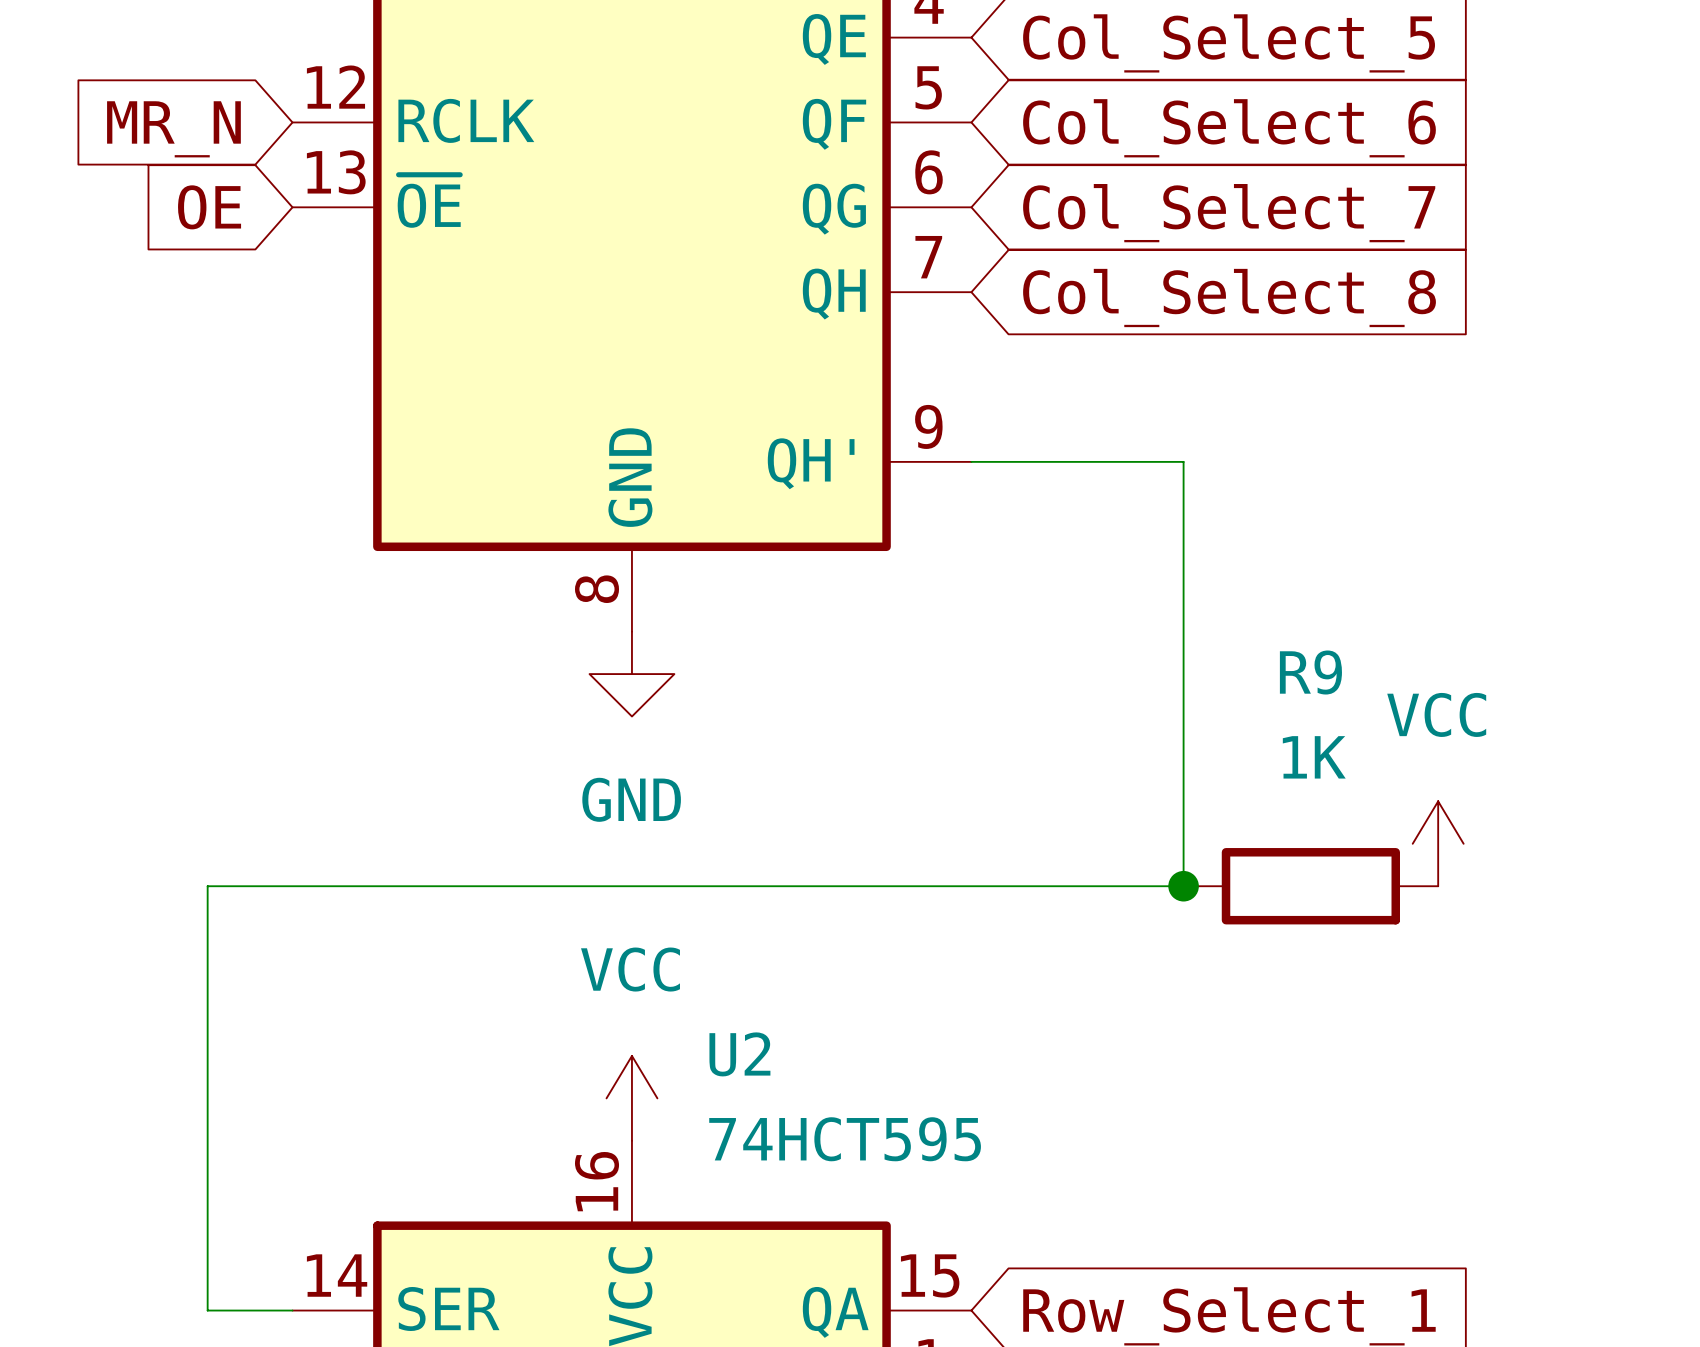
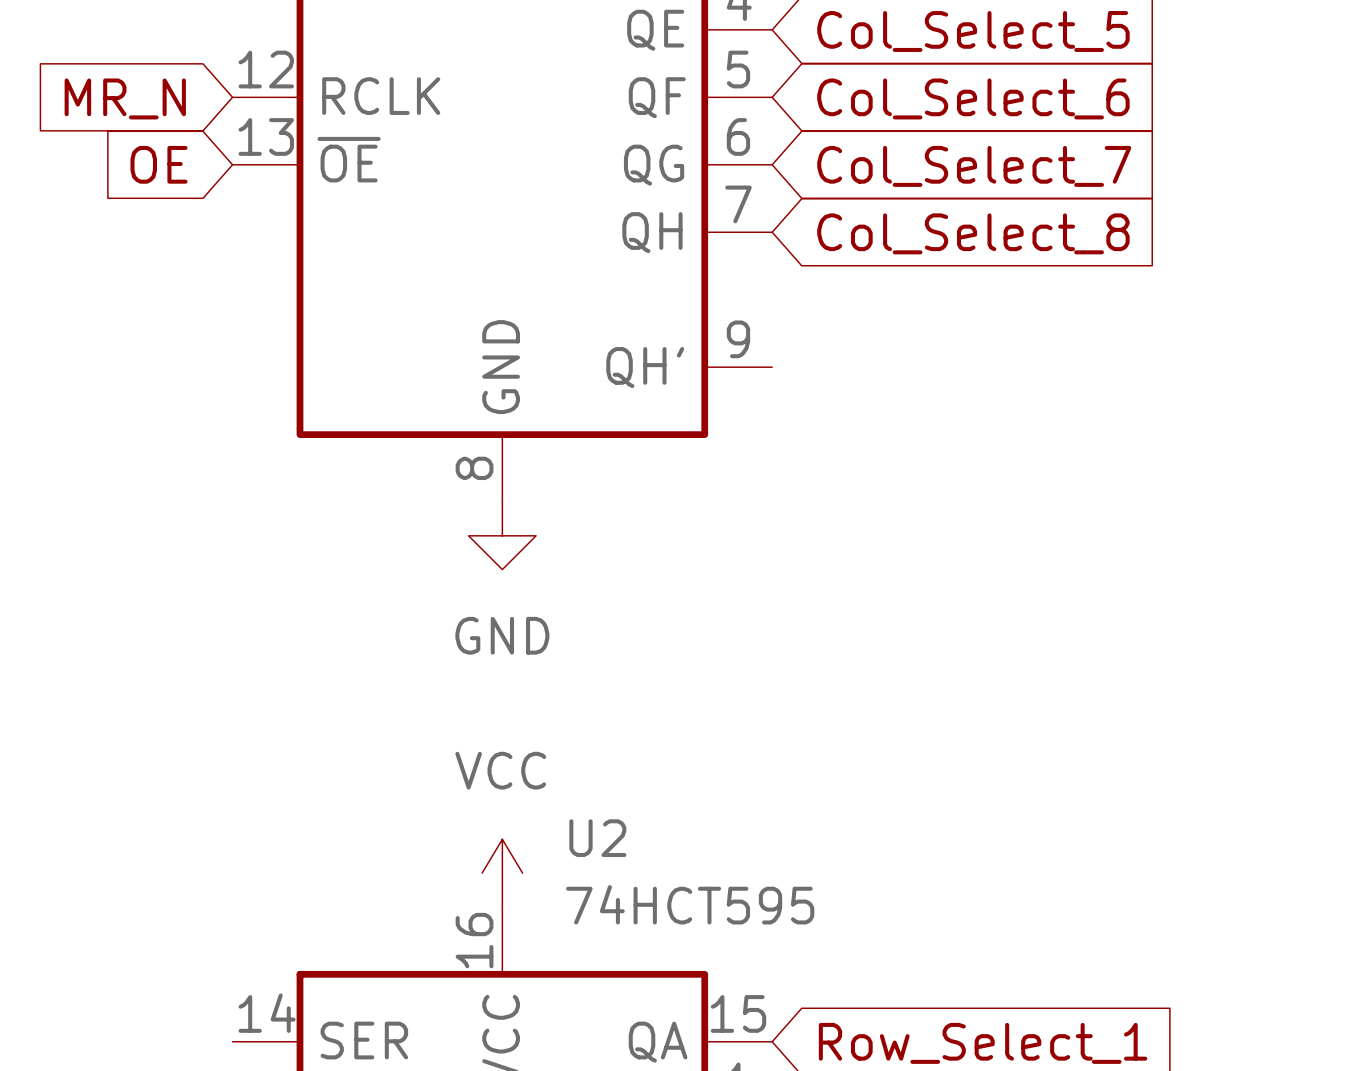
wire: (971, 461) (1183, 461) (1183, 886) (207, 886) (207, 1310) (292, 1310) -> none
power symbol: VCC (1438, 843) -> none
junction: (1183, 886) -> none
R9: 1K (1310, 886) -> none

